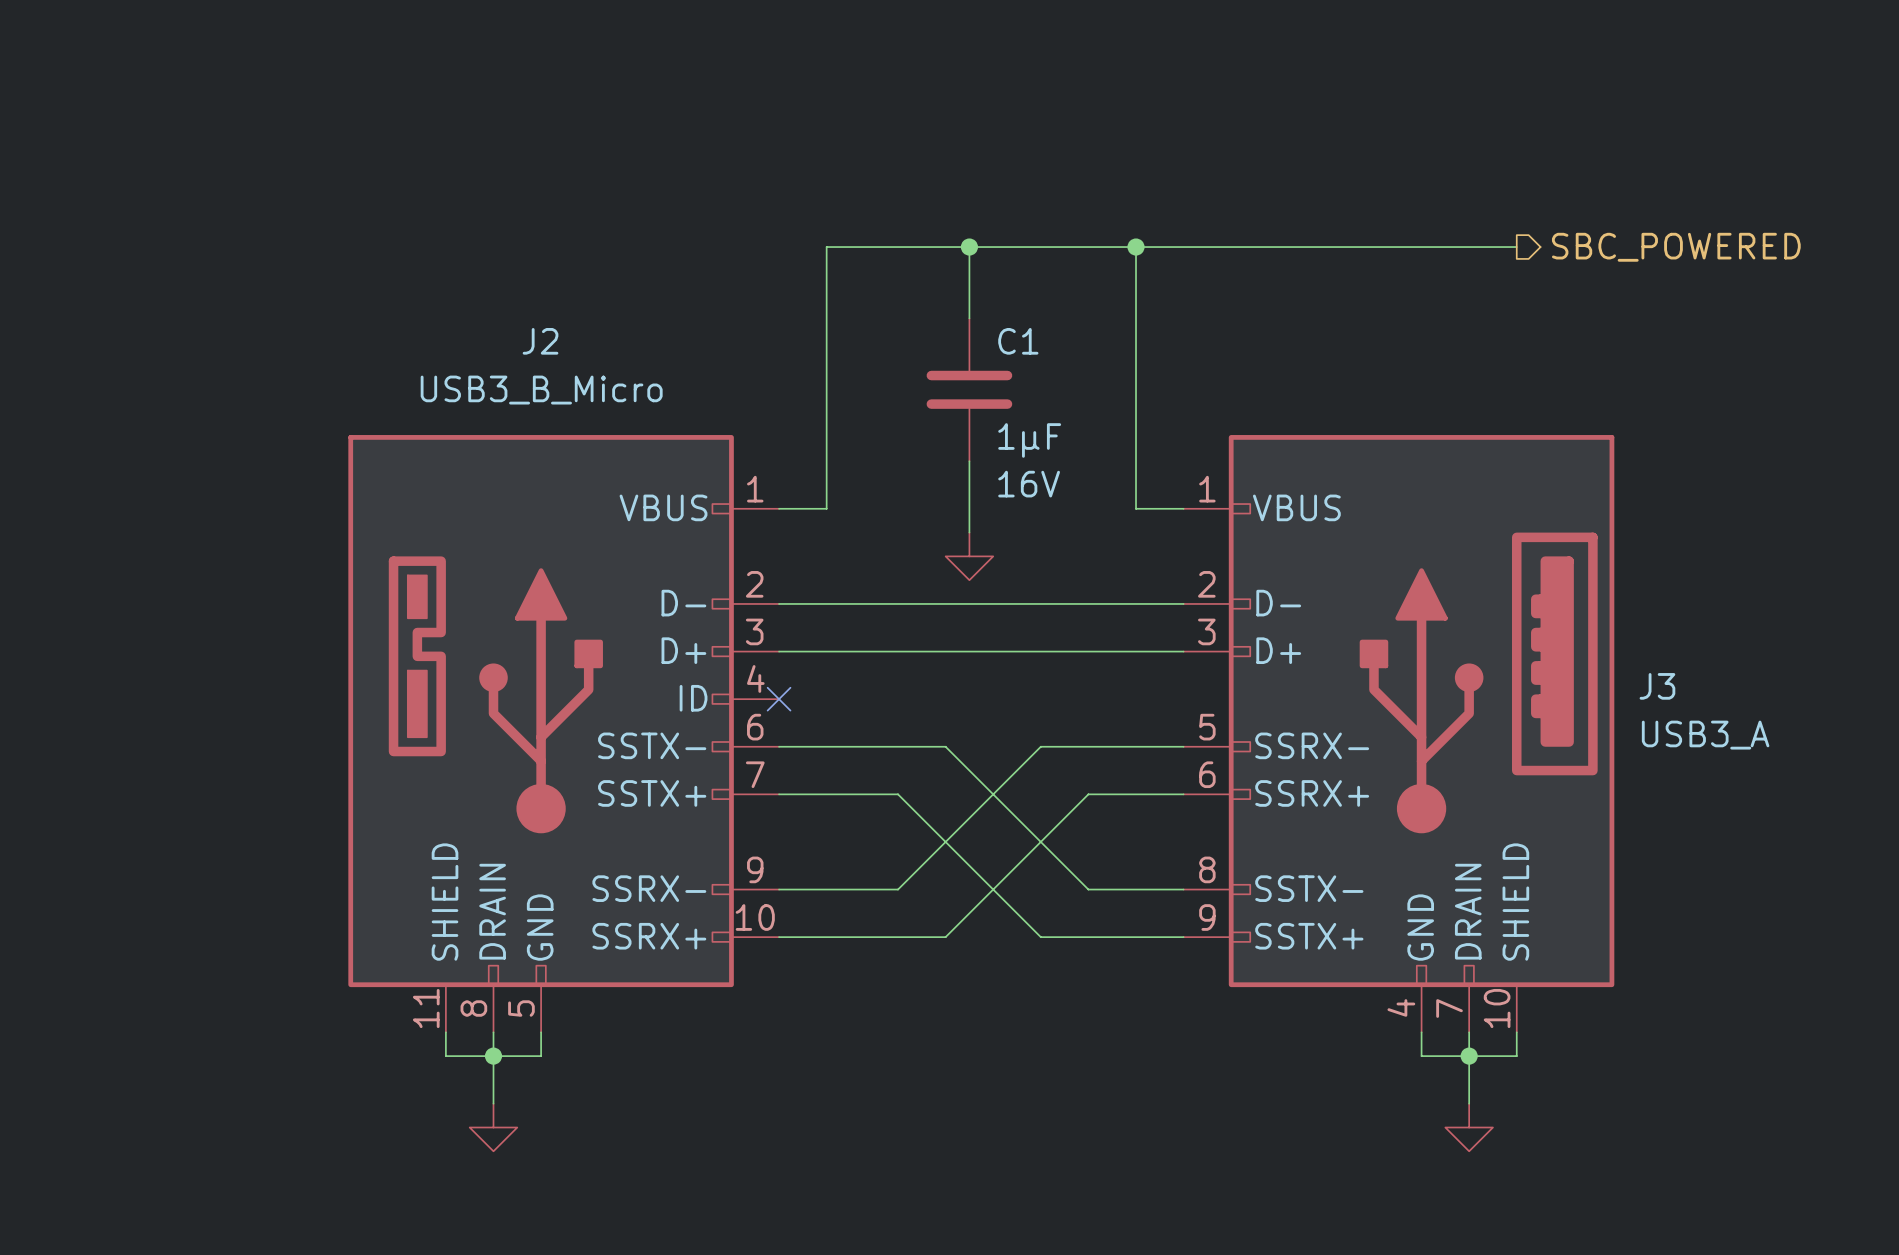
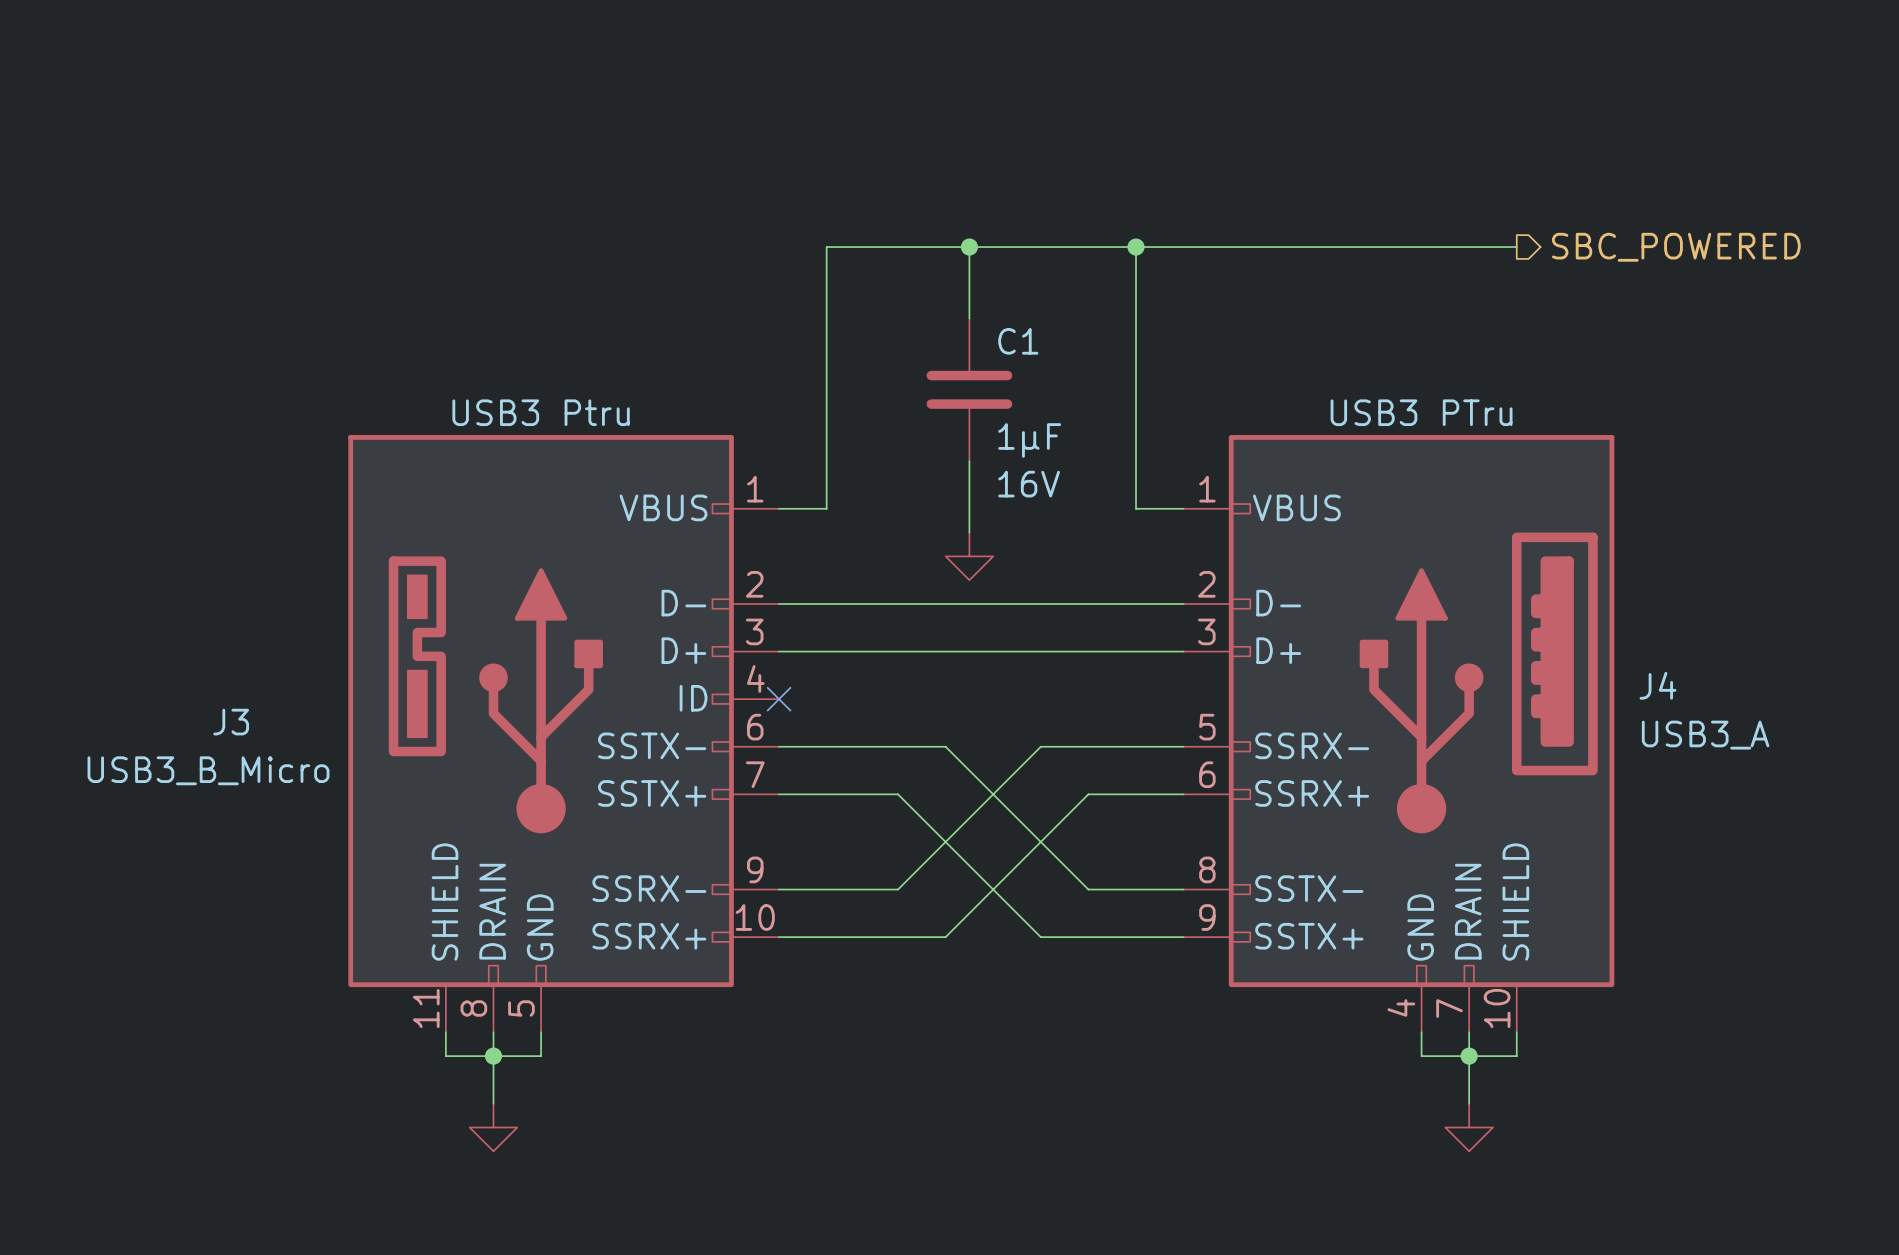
J2 name: J2 (540, 341) -> J3 (231, 722)
J2 value position: USB3_B_Micro (541, 390) -> USB3_B_Micro (208, 770)
J2 text: none -> USB3 Ptru (541, 412)
J3 text: none -> USB3 PTru (1421, 412)
J3 name: J3 (1657, 686) -> J4 (1658, 685)

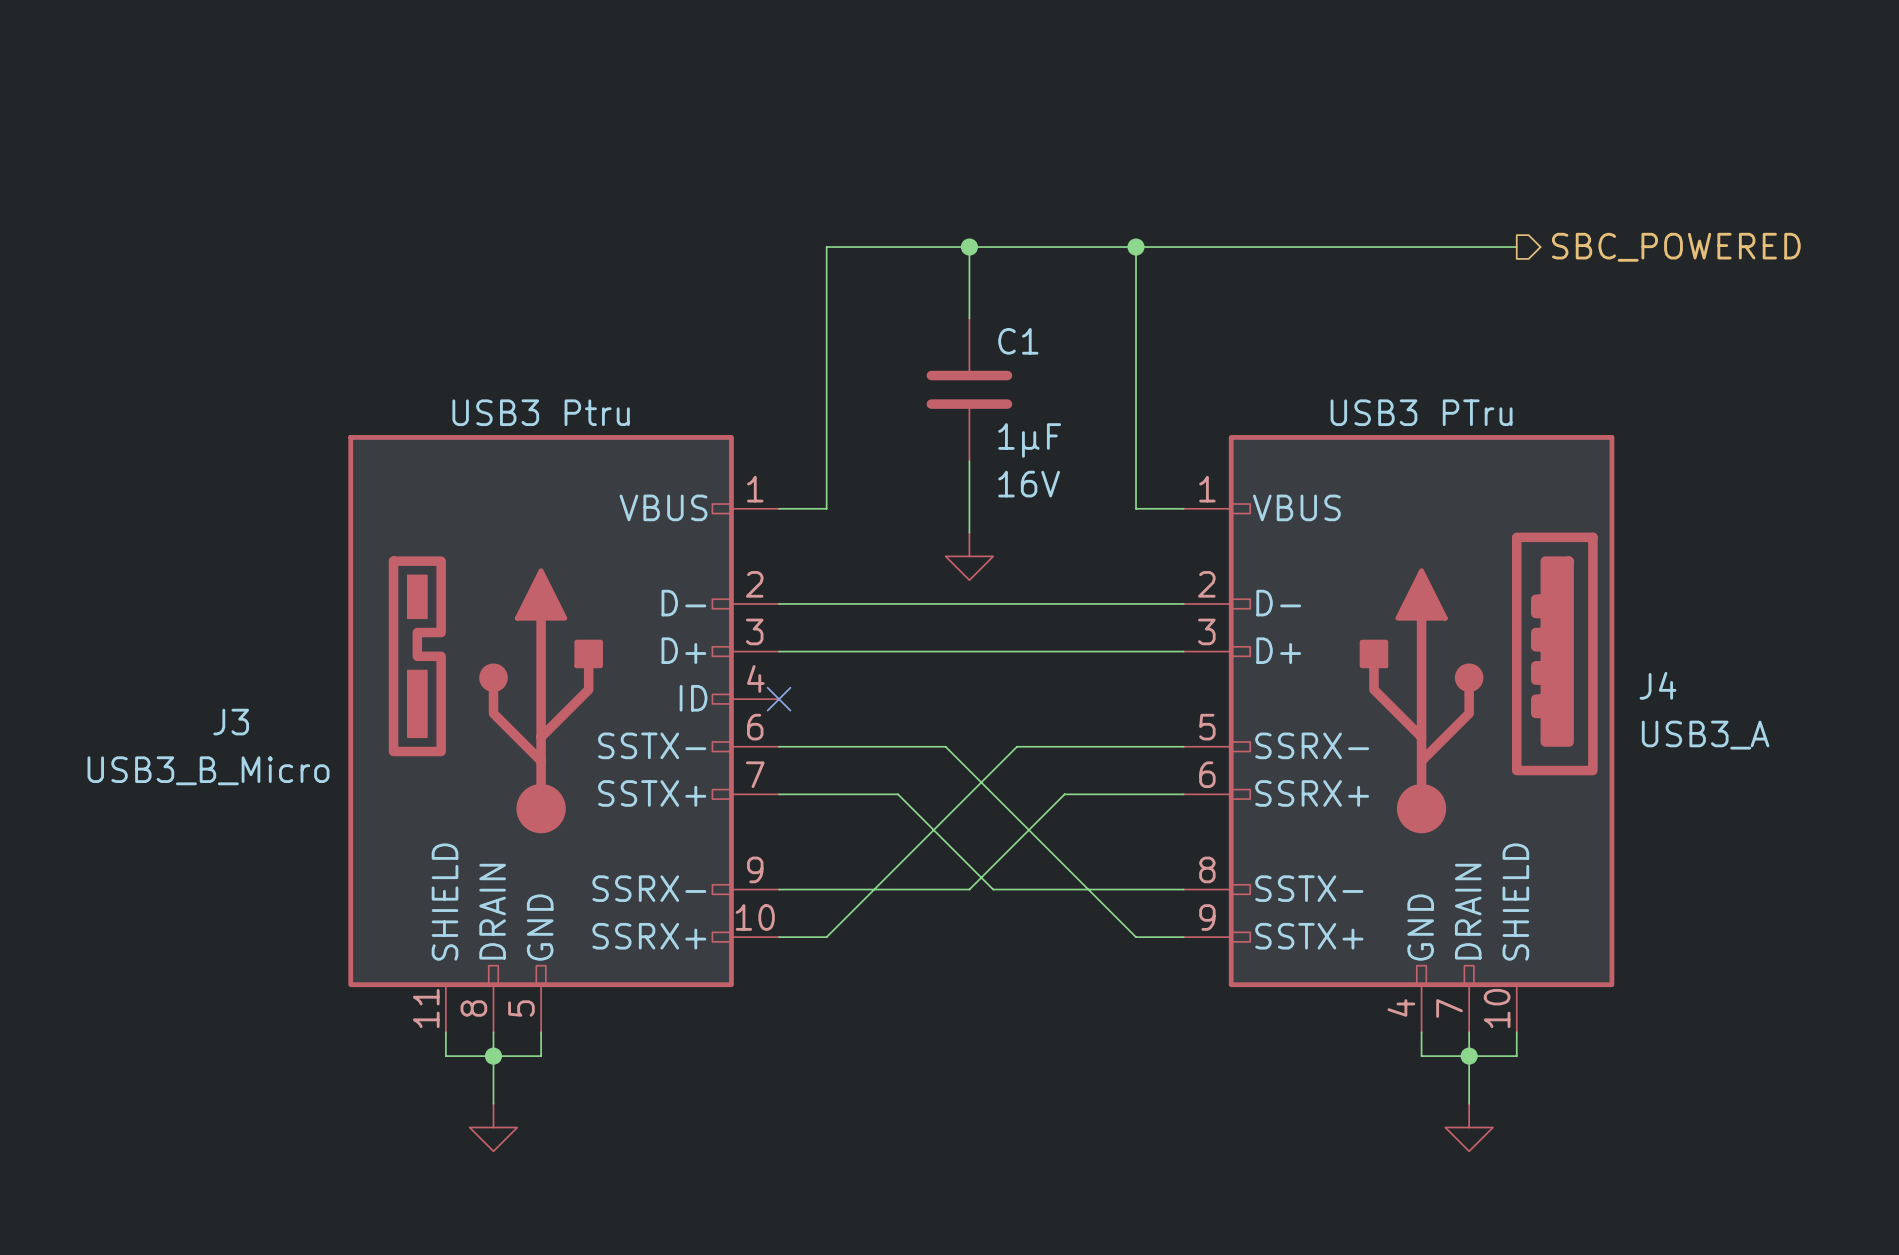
wire: (1040, 746) (898, 889) -> (1088, 794) (1064, 794) (969, 889) (898, 889)
wire: (1088, 794) (945, 937) (826, 937) -> (1040, 746) (1017, 746) (826, 937)
wire: (993, 889) (1040, 937) (1136, 937) -> (993, 889) (1088, 889) (1136, 937)

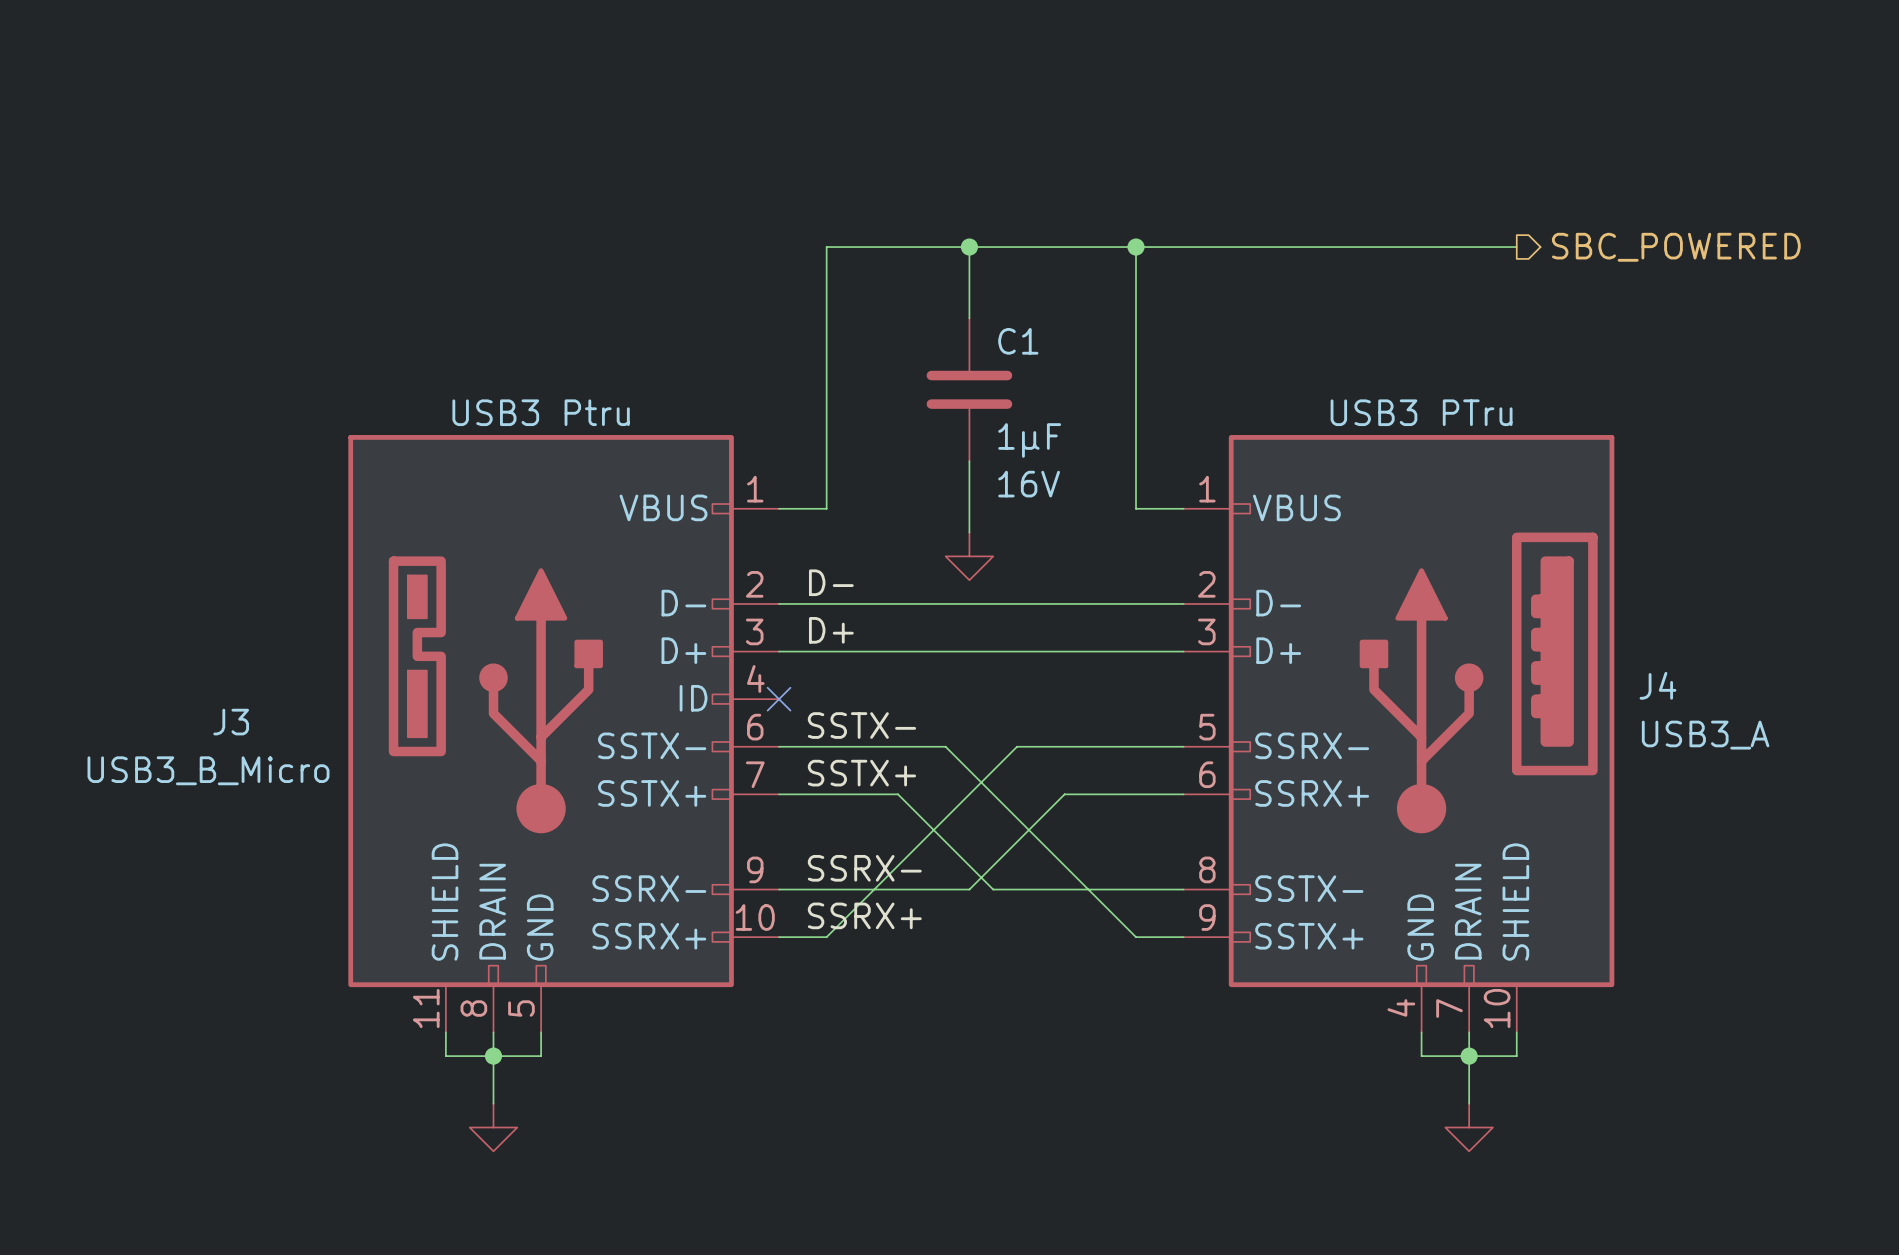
label: none -> D- (831, 582)
label: none -> D+ (831, 630)
label: none -> SSTX- (861, 725)
label: none -> SSTX+ (861, 773)
label: none -> SSRX- (864, 868)
label: none -> SSRX+ (864, 915)

